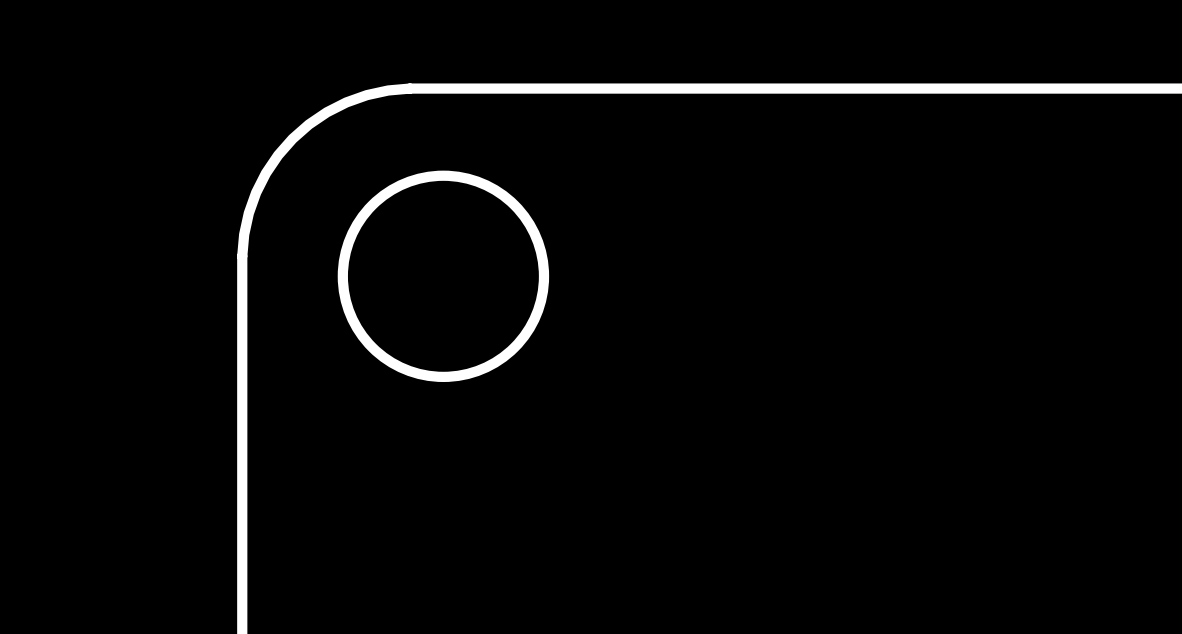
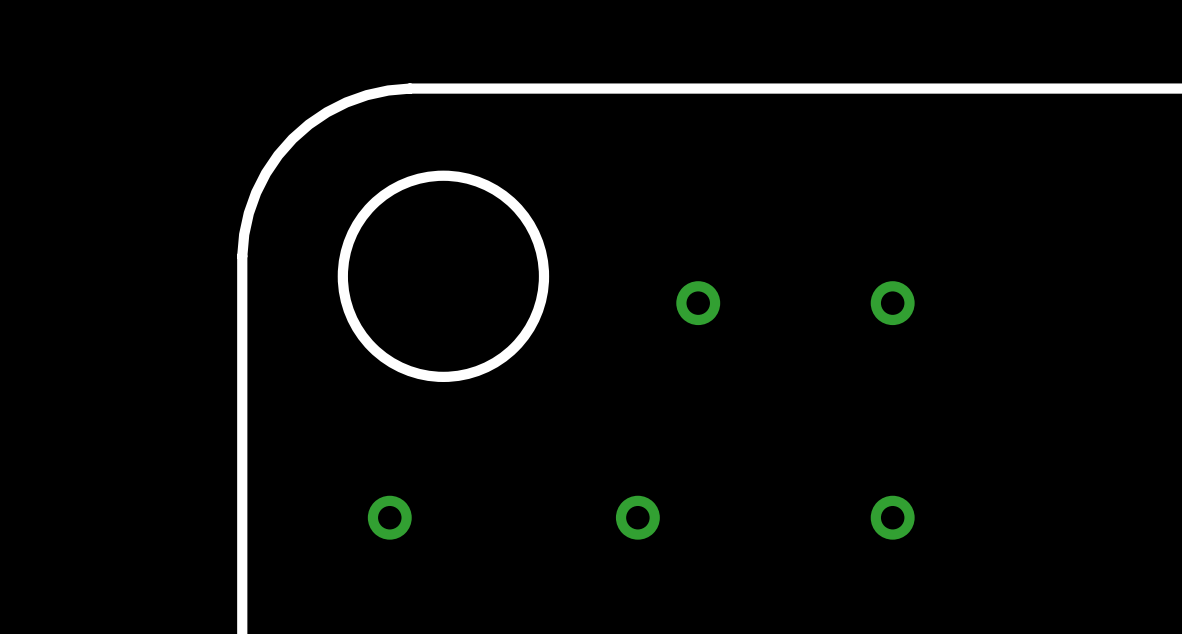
via: none -> (698, 303)
via: none -> (892, 303)
via: none -> (389, 517)
via: none -> (637, 517)
via: none -> (892, 517)

